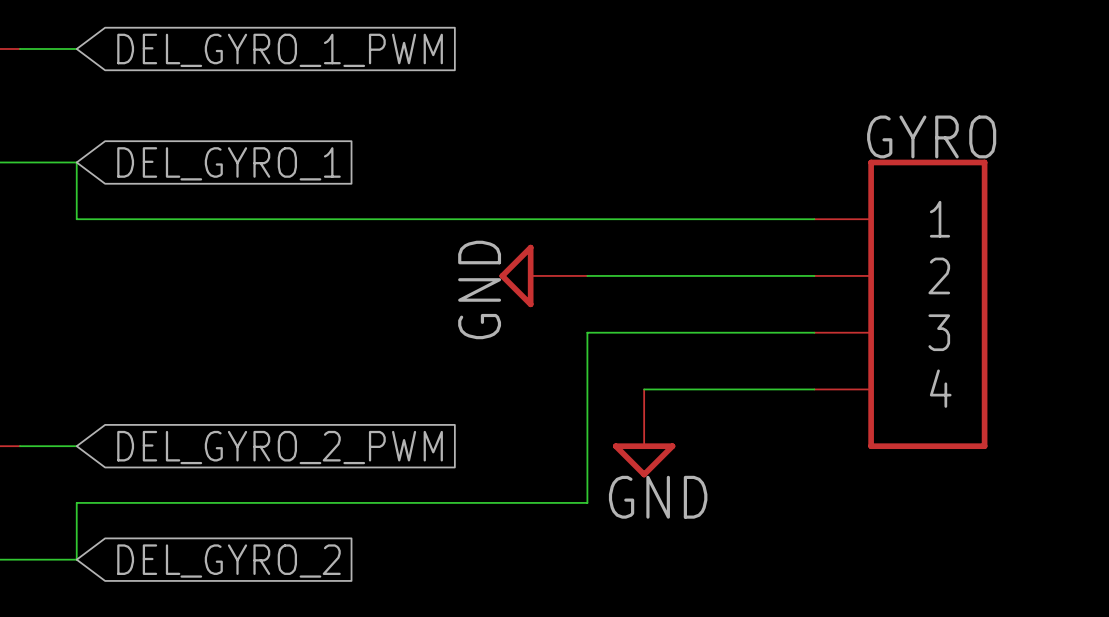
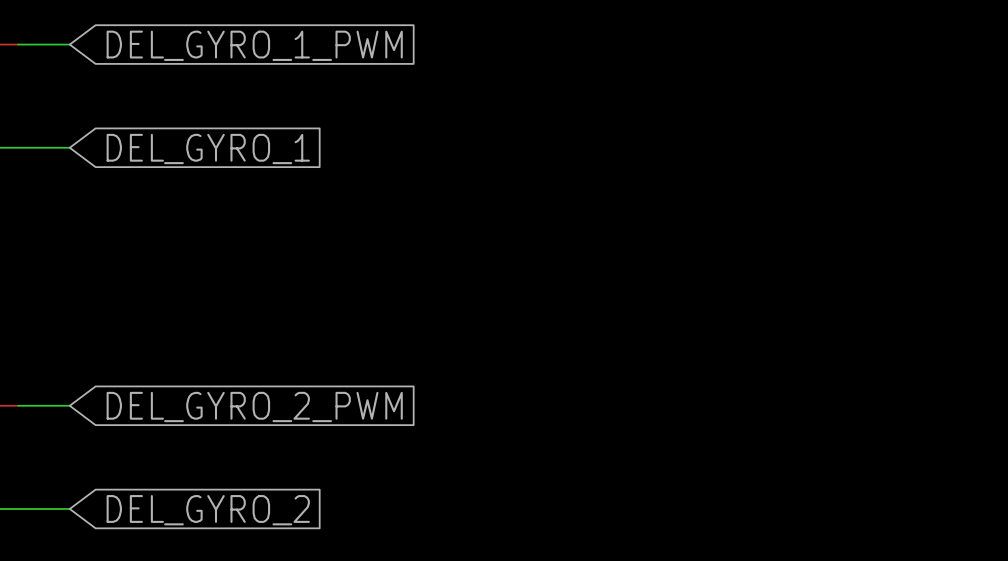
wire: (76, 162) (76, 219) (814, 219) -> none
power symbol: GND (543, 275) -> none
wire: (587, 275) (814, 275) -> none
GYRO: (900, 304) -> none
wire: (814, 332) (587, 332) (587, 502) (76, 502) (76, 559) -> none
wire: (644, 389) (814, 389) -> none
power symbol: GND (644, 433) -> none

